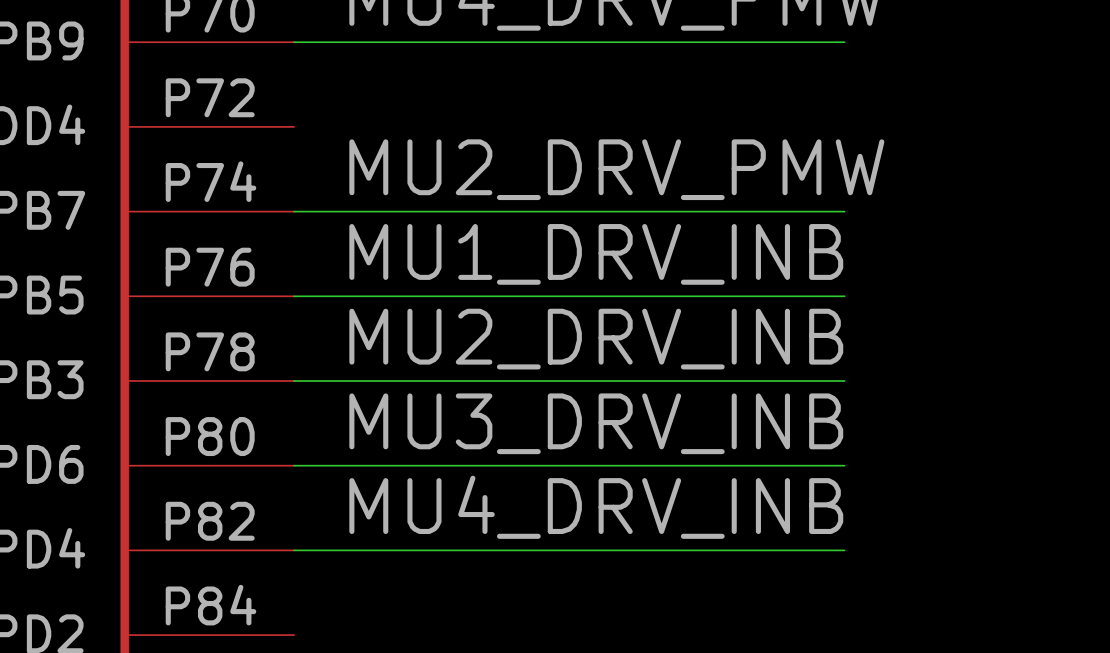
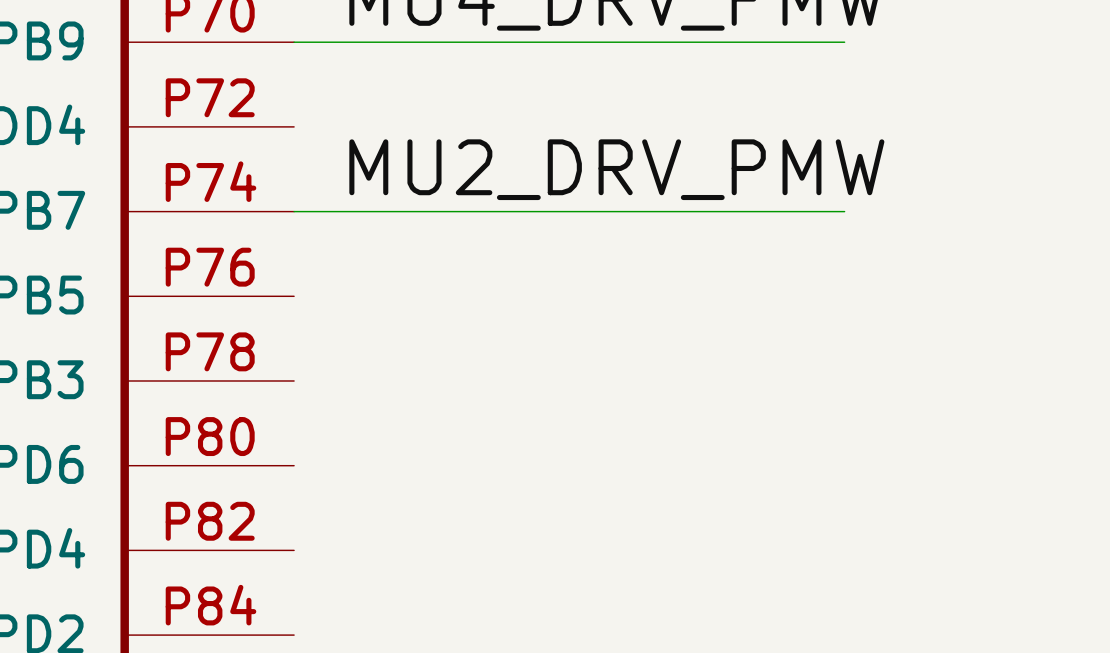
label: MU1_DRV_INB (596, 254) -> none
wire: (294, 296) (844, 296) -> none
label: MU2_DRV_INB (596, 339) -> none
wire: (294, 380) (844, 380) -> none
label: MU3_DRV_INB (596, 423) -> none
wire: (294, 465) (844, 465) -> none
label: MU4_DRV_INB (596, 507) -> none
wire: (294, 550) (844, 550) -> none

